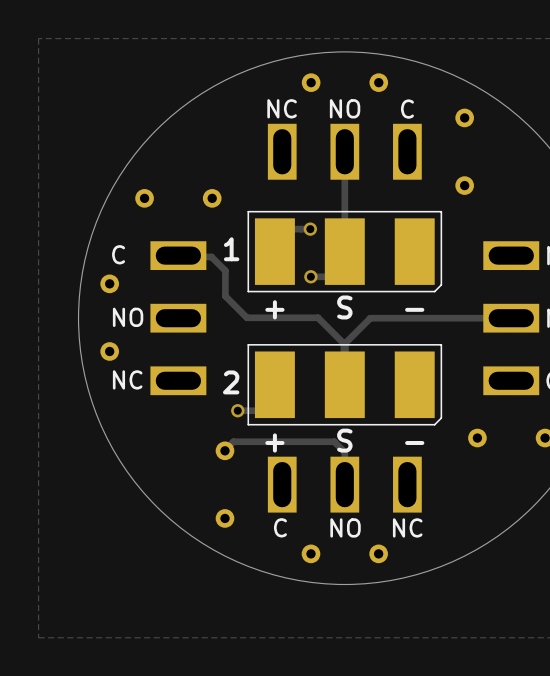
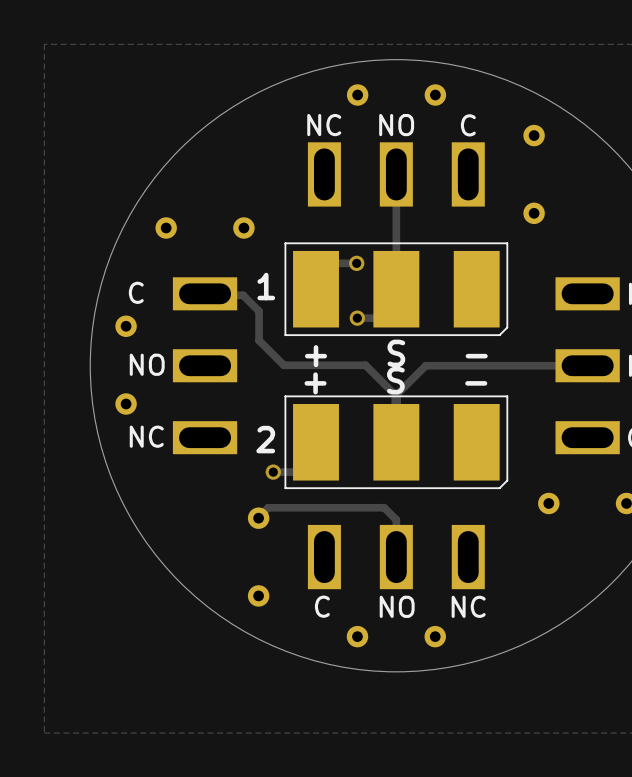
part text position: S (344, 440) -> S (395, 380)
part text position: + (274, 442) -> + (315, 383)
part text position: - (414, 442) -> - (476, 383)

